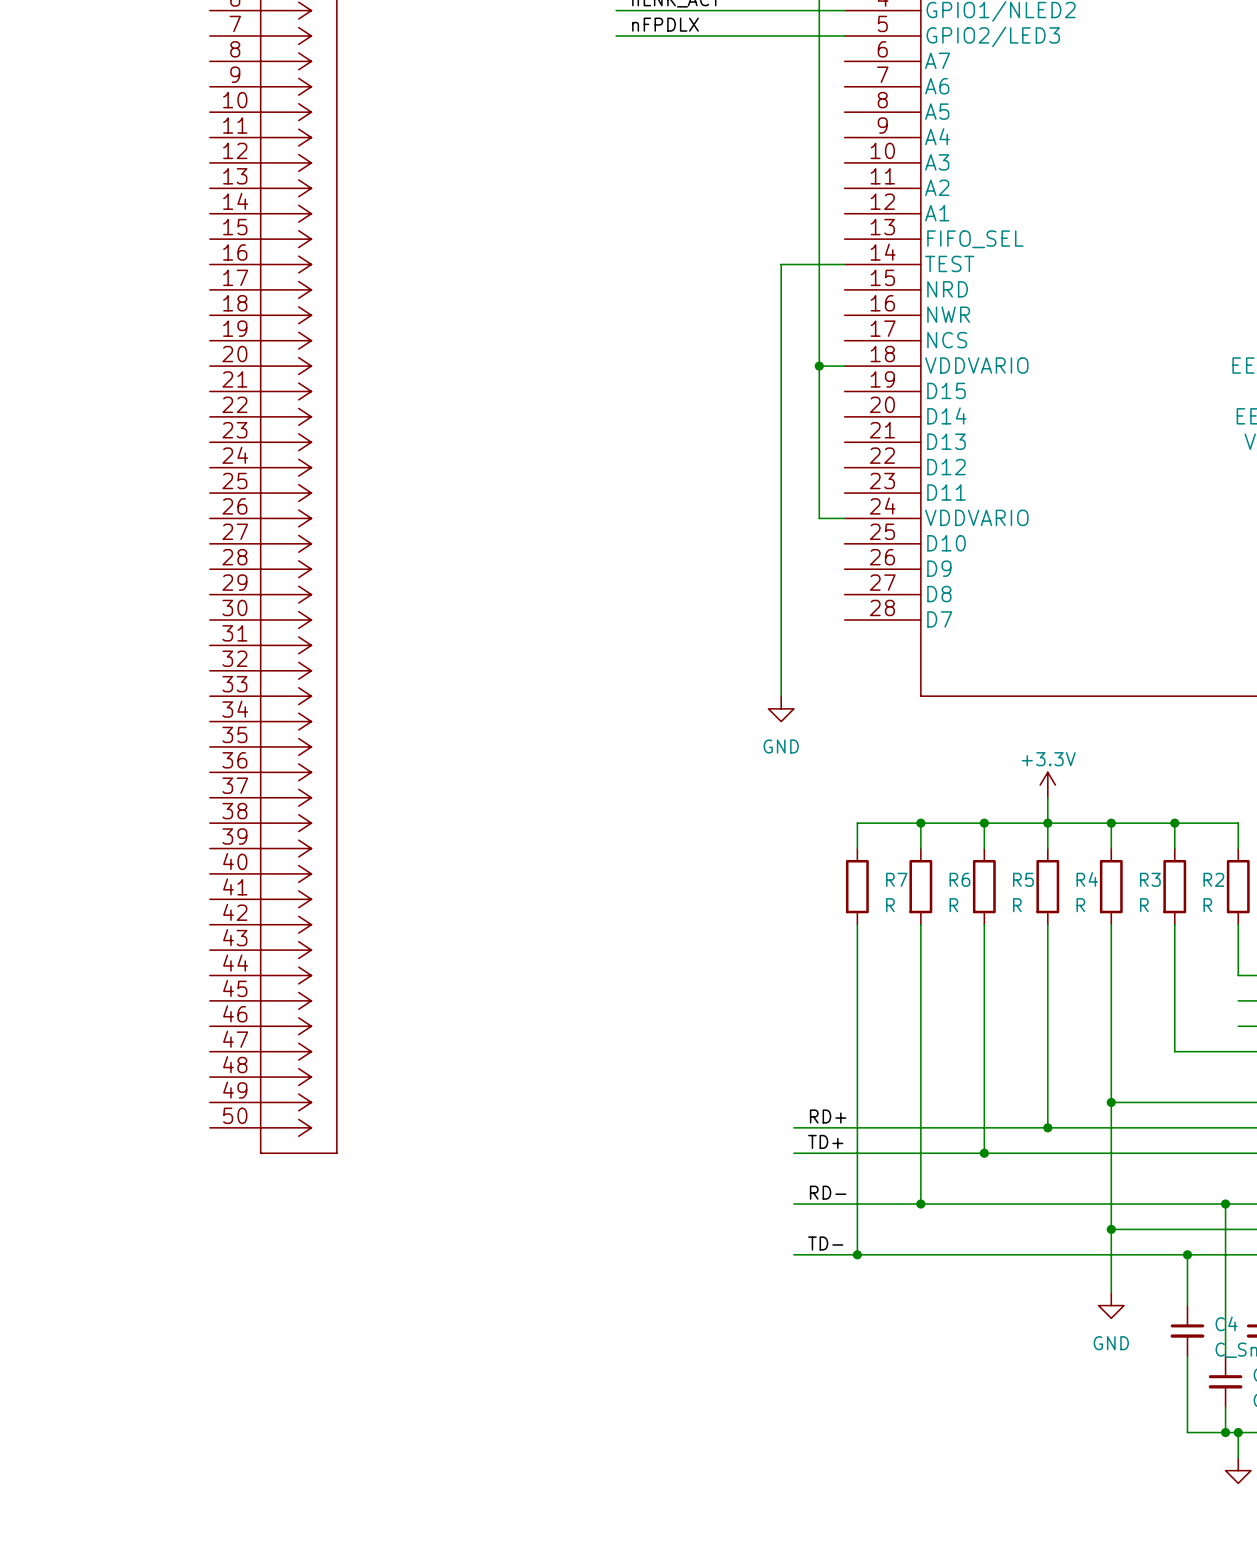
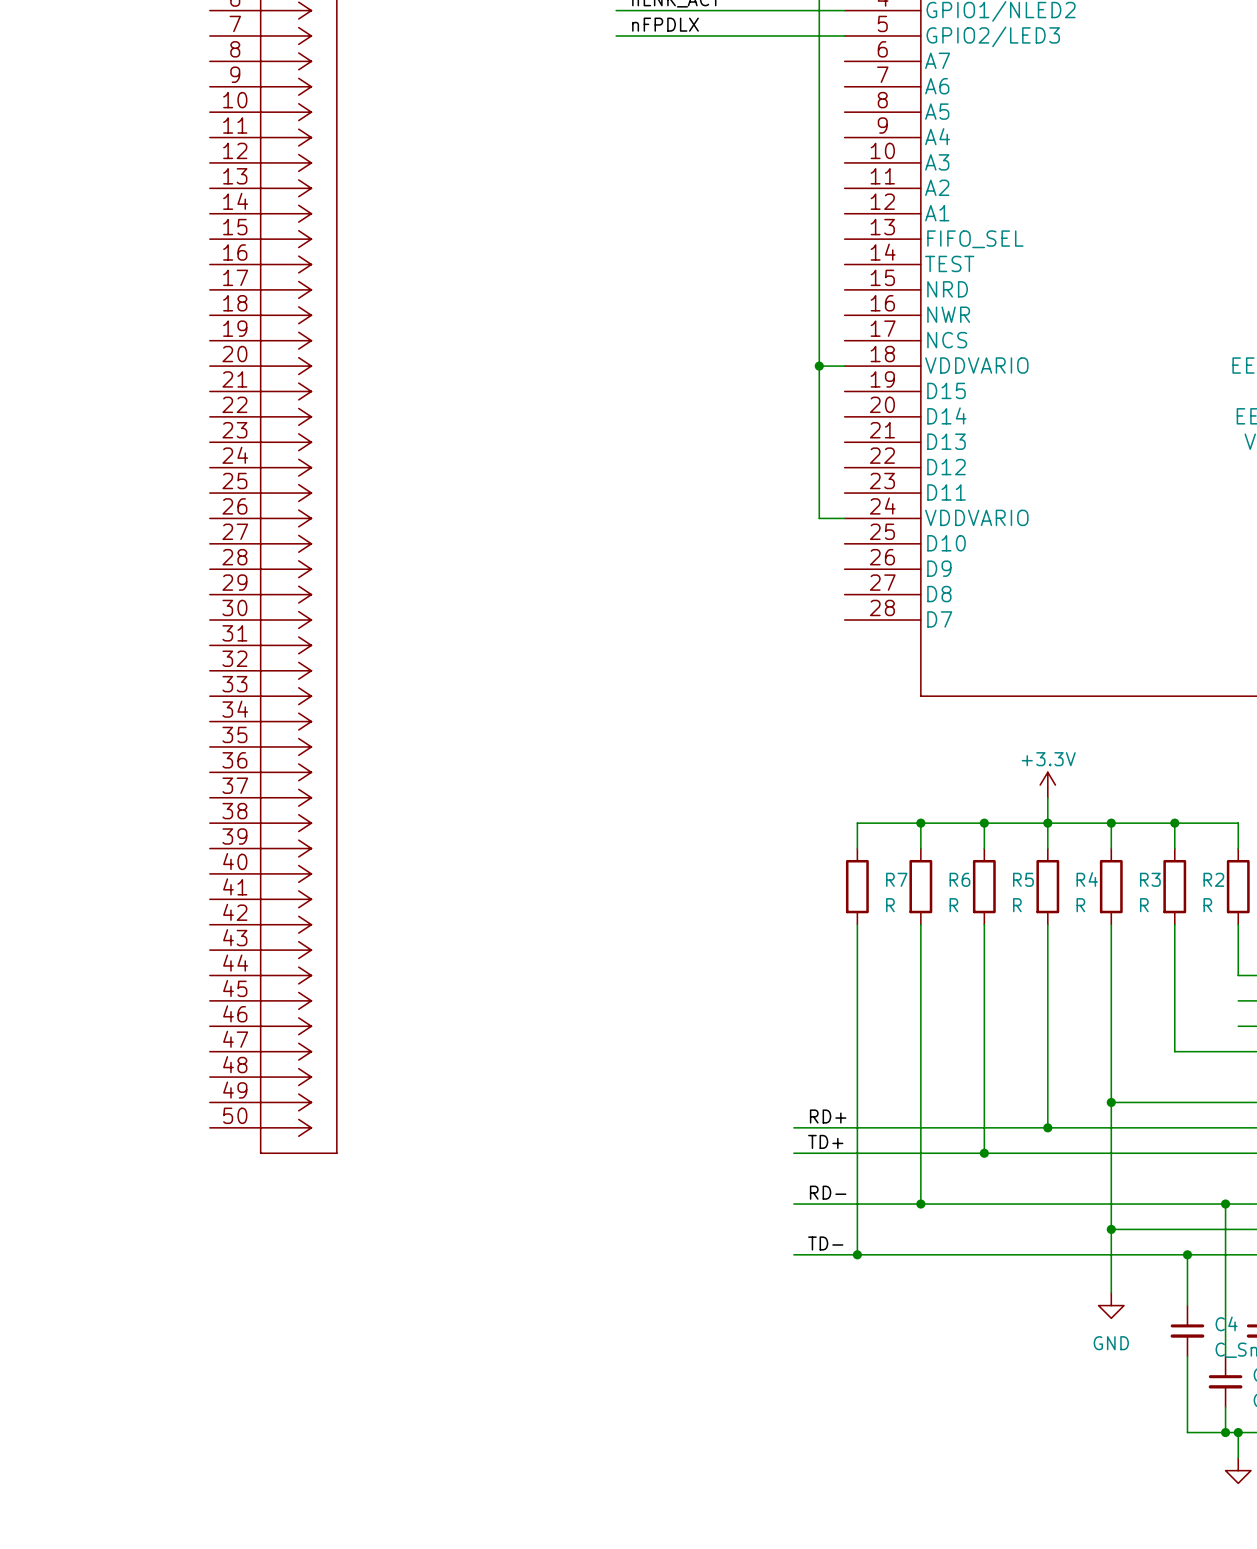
wire: (844, 264) (781, 264) (781, 696) -> none
power symbol: GND (781, 708) -> none

